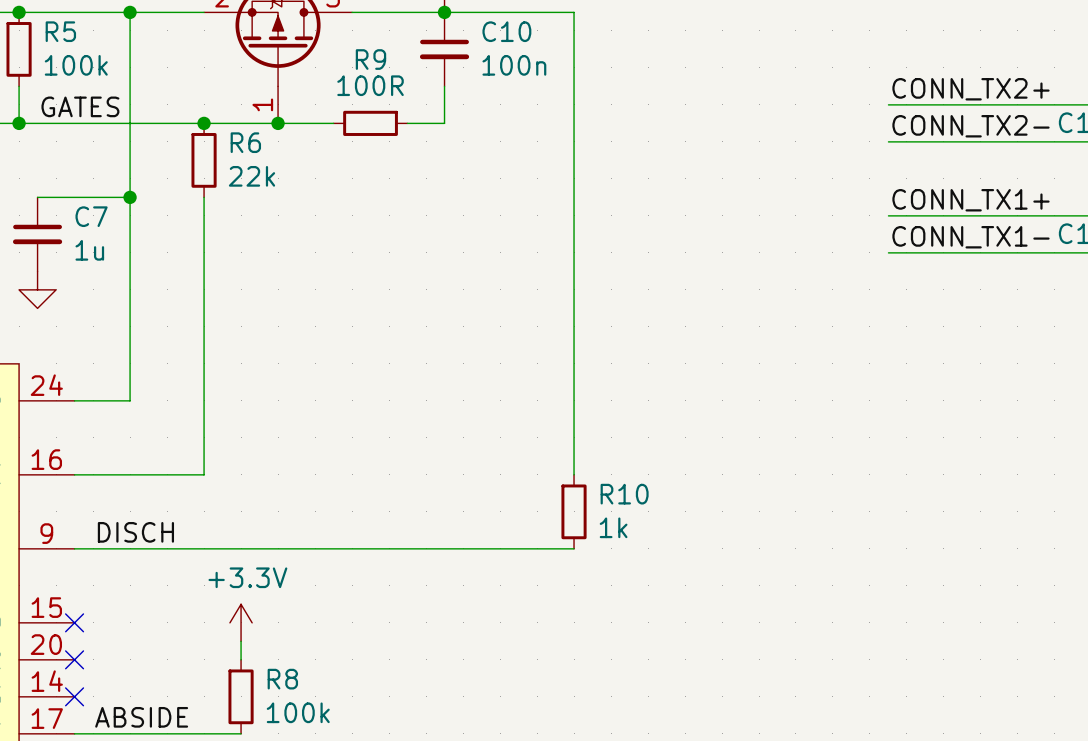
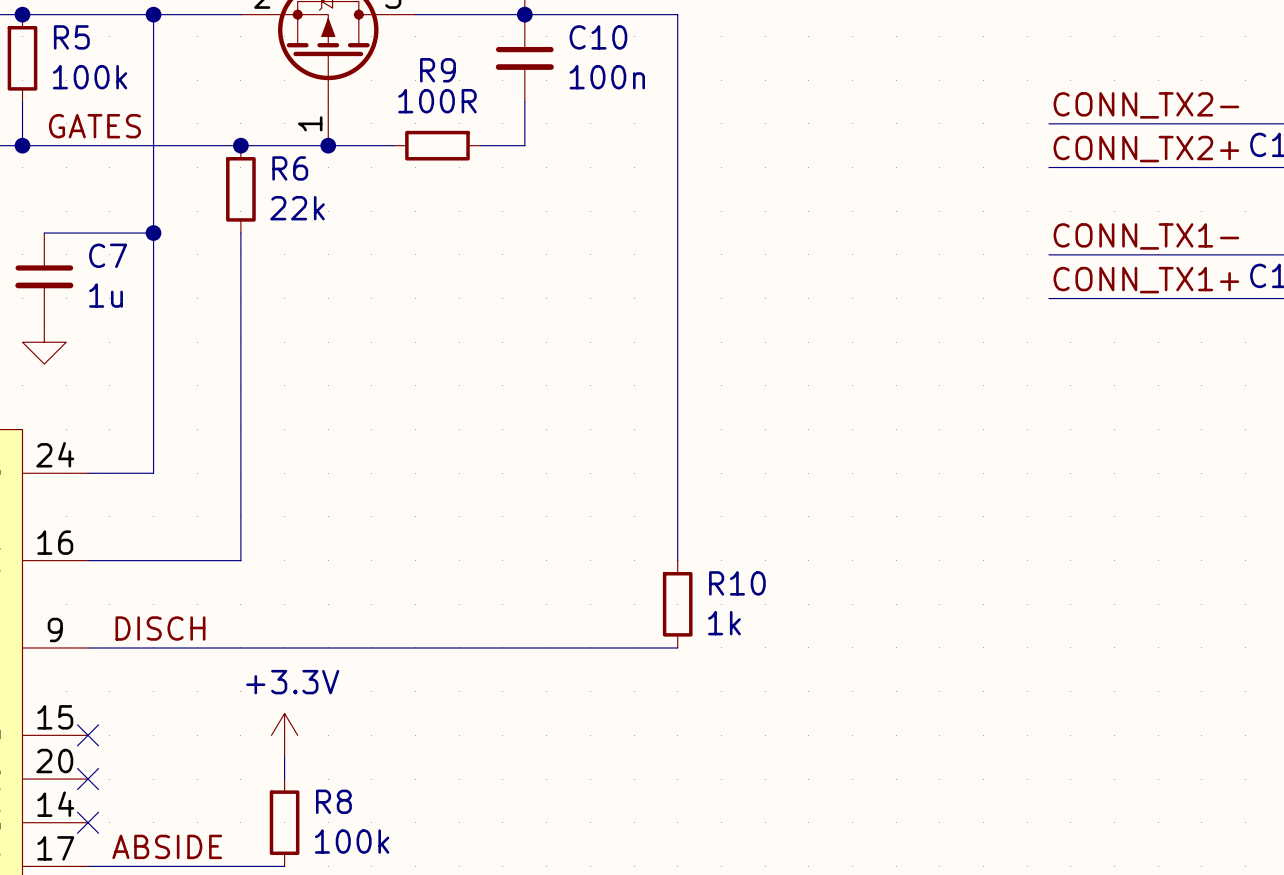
label: CONN_TX2+ (970, 89) -> CONN_TX2- (1146, 105)
label: CONN_TX2- (970, 126) -> CONN_TX2+ (1146, 149)
label: CONN_TX1+ (970, 200) -> CONN_TX1- (1146, 236)
label: CONN_TX1- (970, 237) -> CONN_TX1+ (1146, 280)

